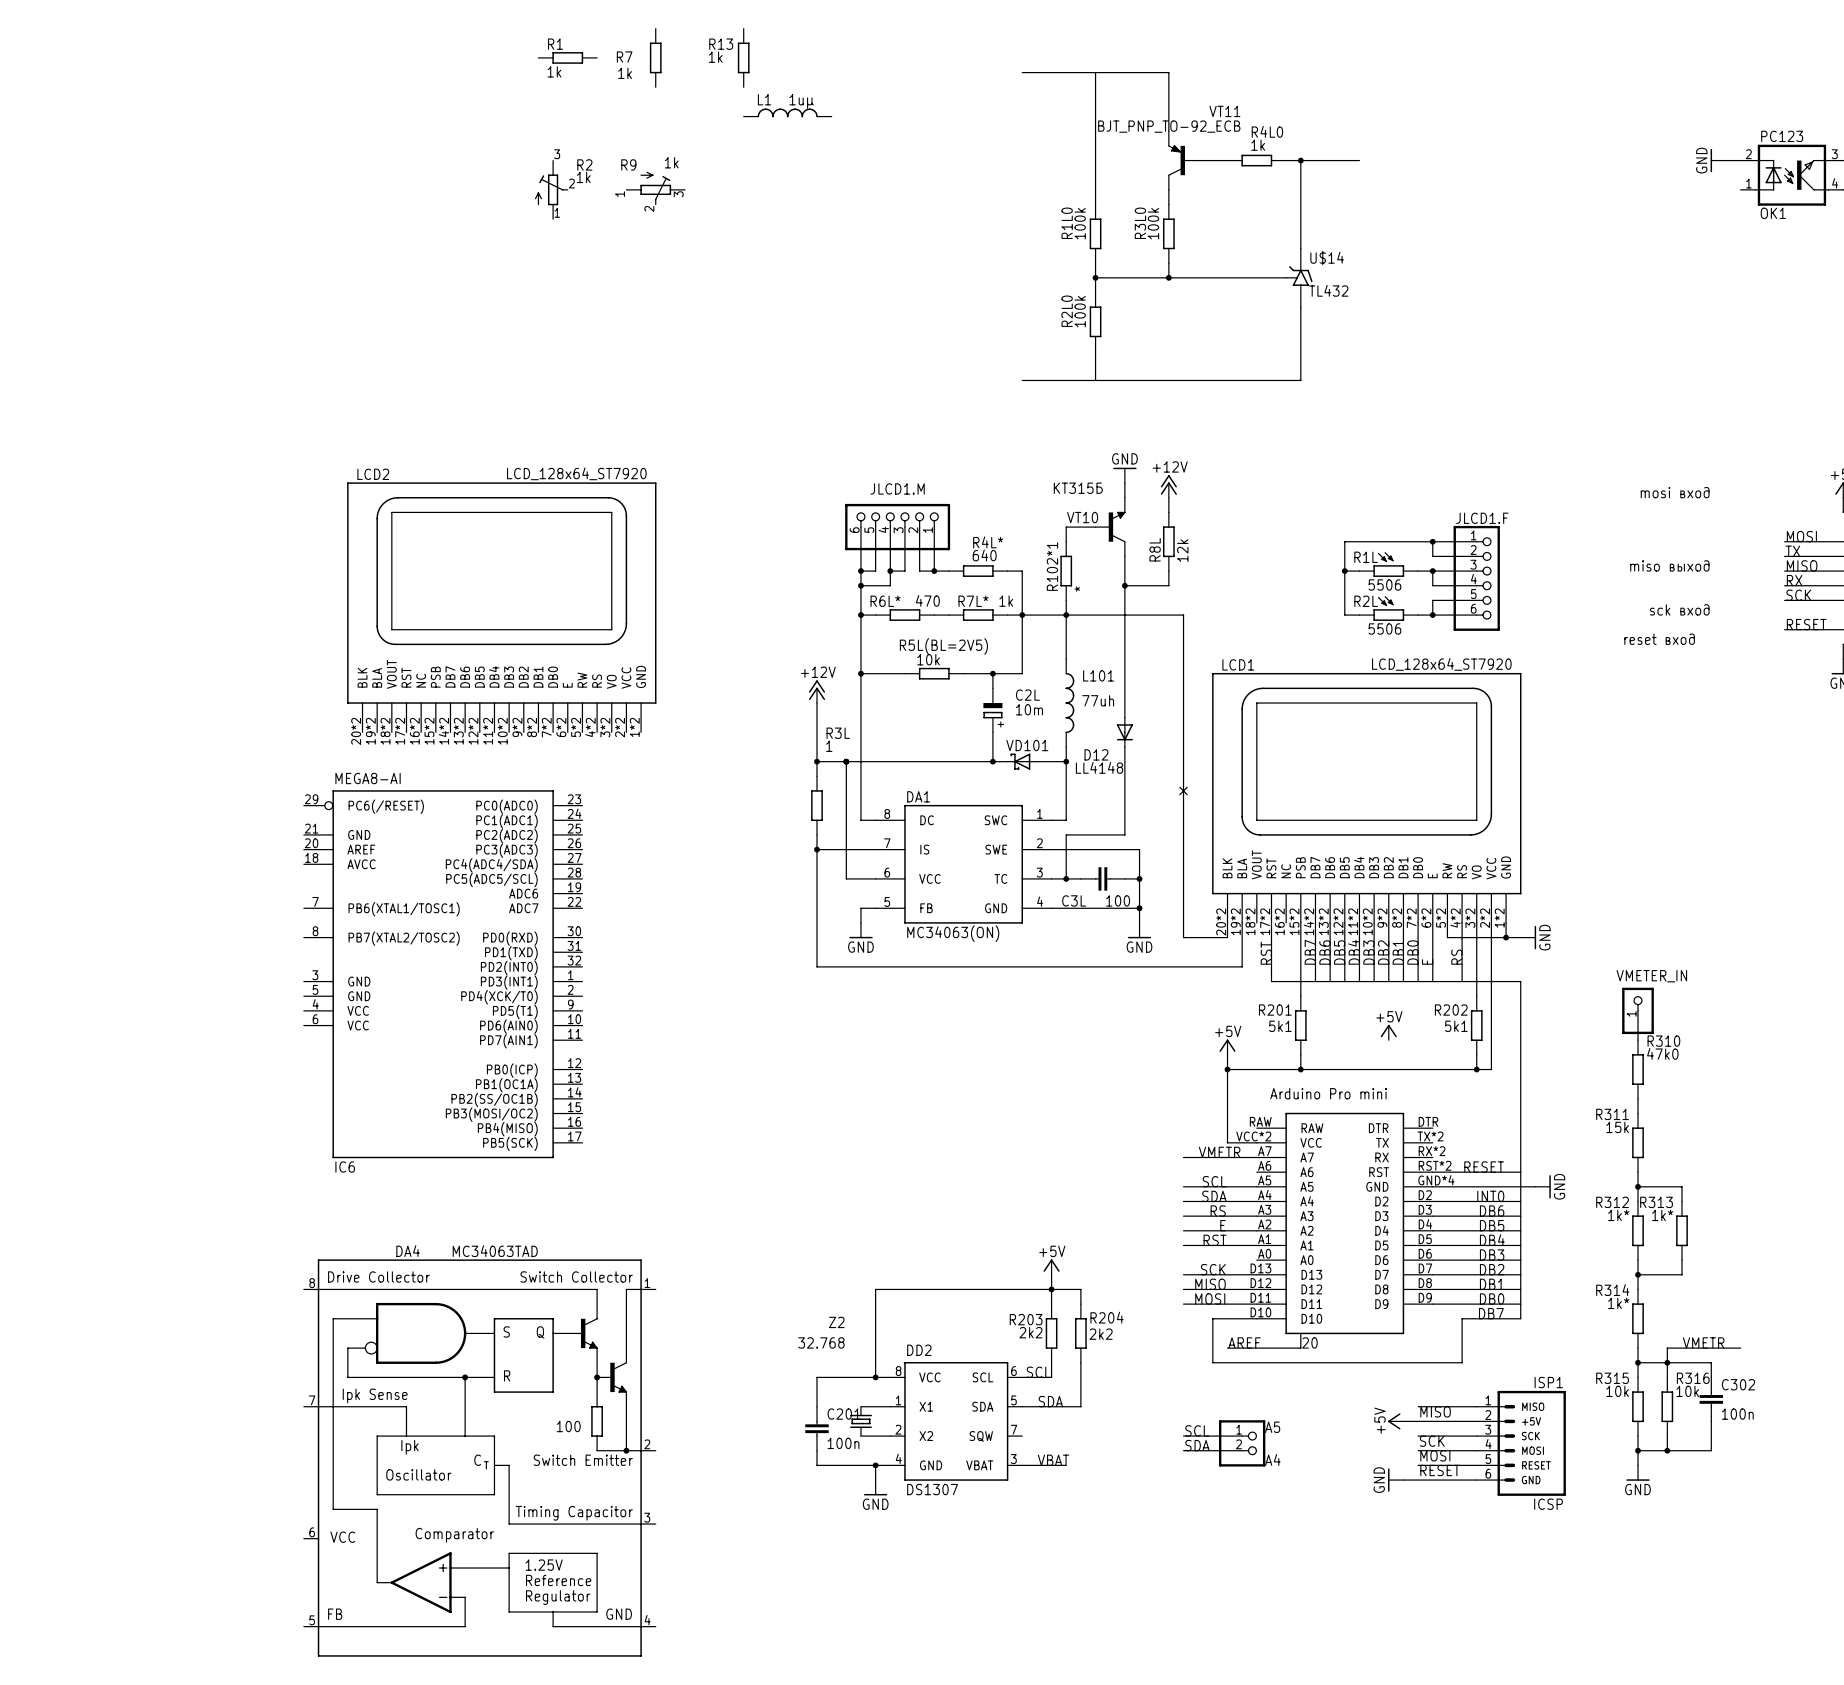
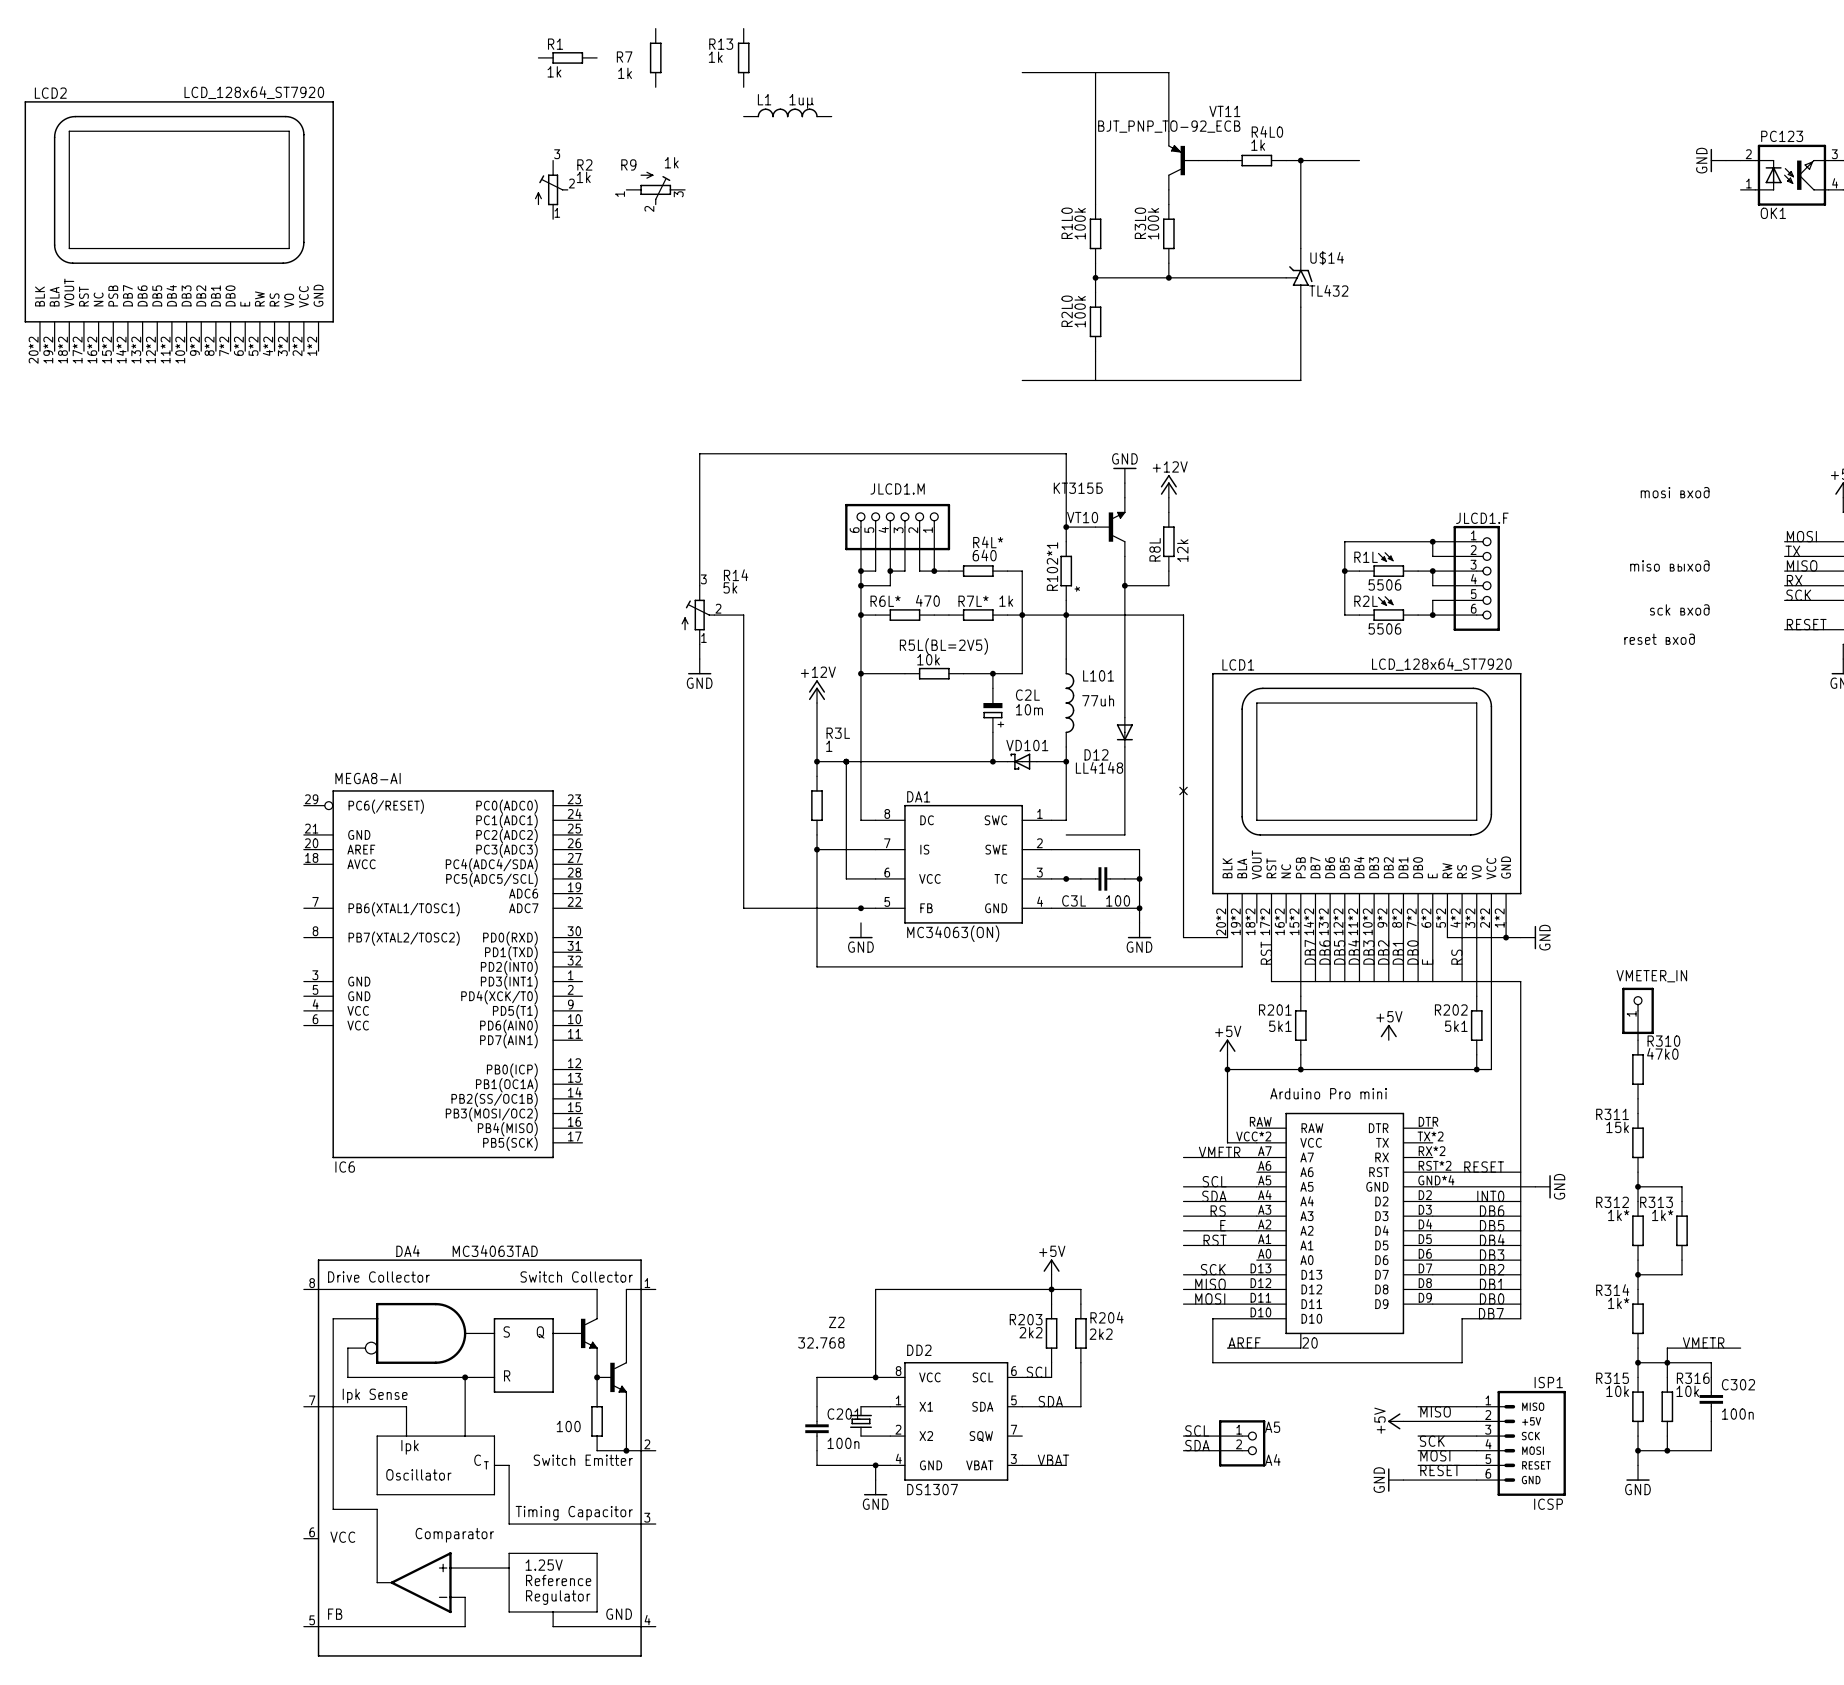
wire: none -> (1066, 527) (1066, 453) (699, 453) (699, 585)
junction: none -> (1066, 527)
LCD2 position: (501, 607) -> (179, 226)
R14: none -> 5k (698, 615)
wire: none -> (699, 644) (699, 659)
power symbol: none -> GND (699, 666)
wire: (1066, 834) (1066, 878) -> none
wire: (860, 908) (860, 922) -> (860, 908) (743, 908) (743, 615) (714, 615)
junction: none -> (860, 908)

